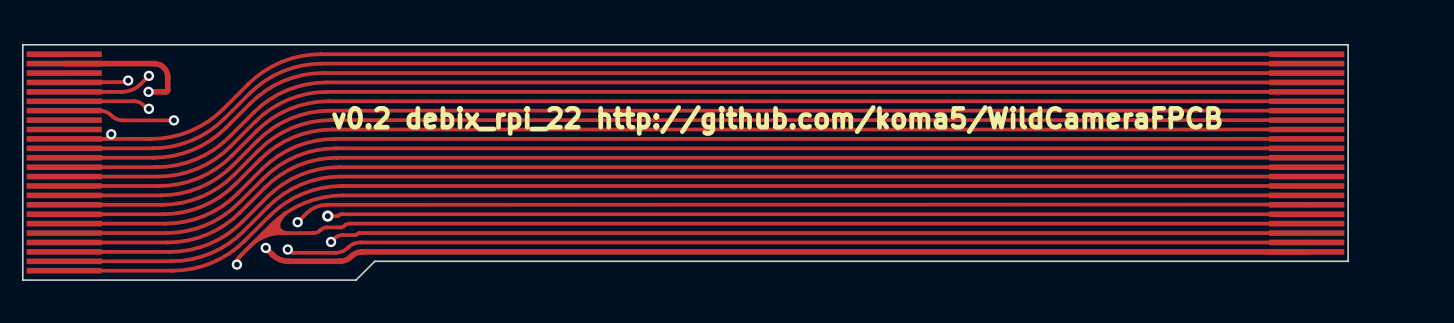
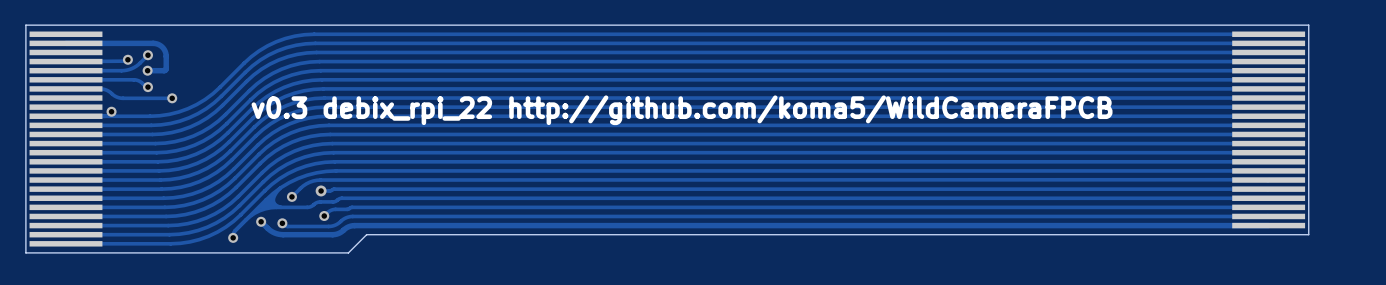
text: v0.2 debix_rpi_22 http://github.com/koma5/WildCameraFPCB (776, 120) -> v0.3 debix_rpi_22 http://github.com/koma5/WildCameraFPCB (682, 110)

